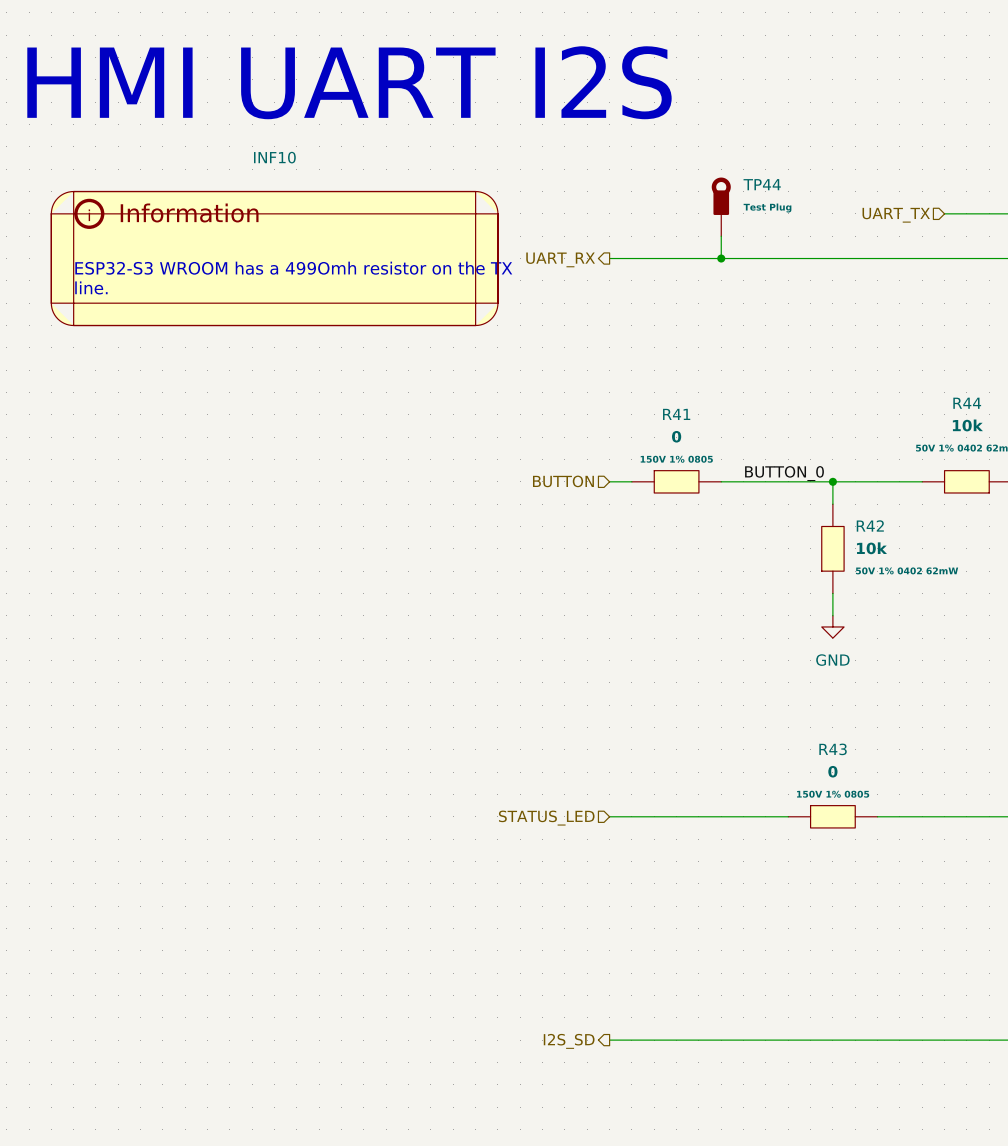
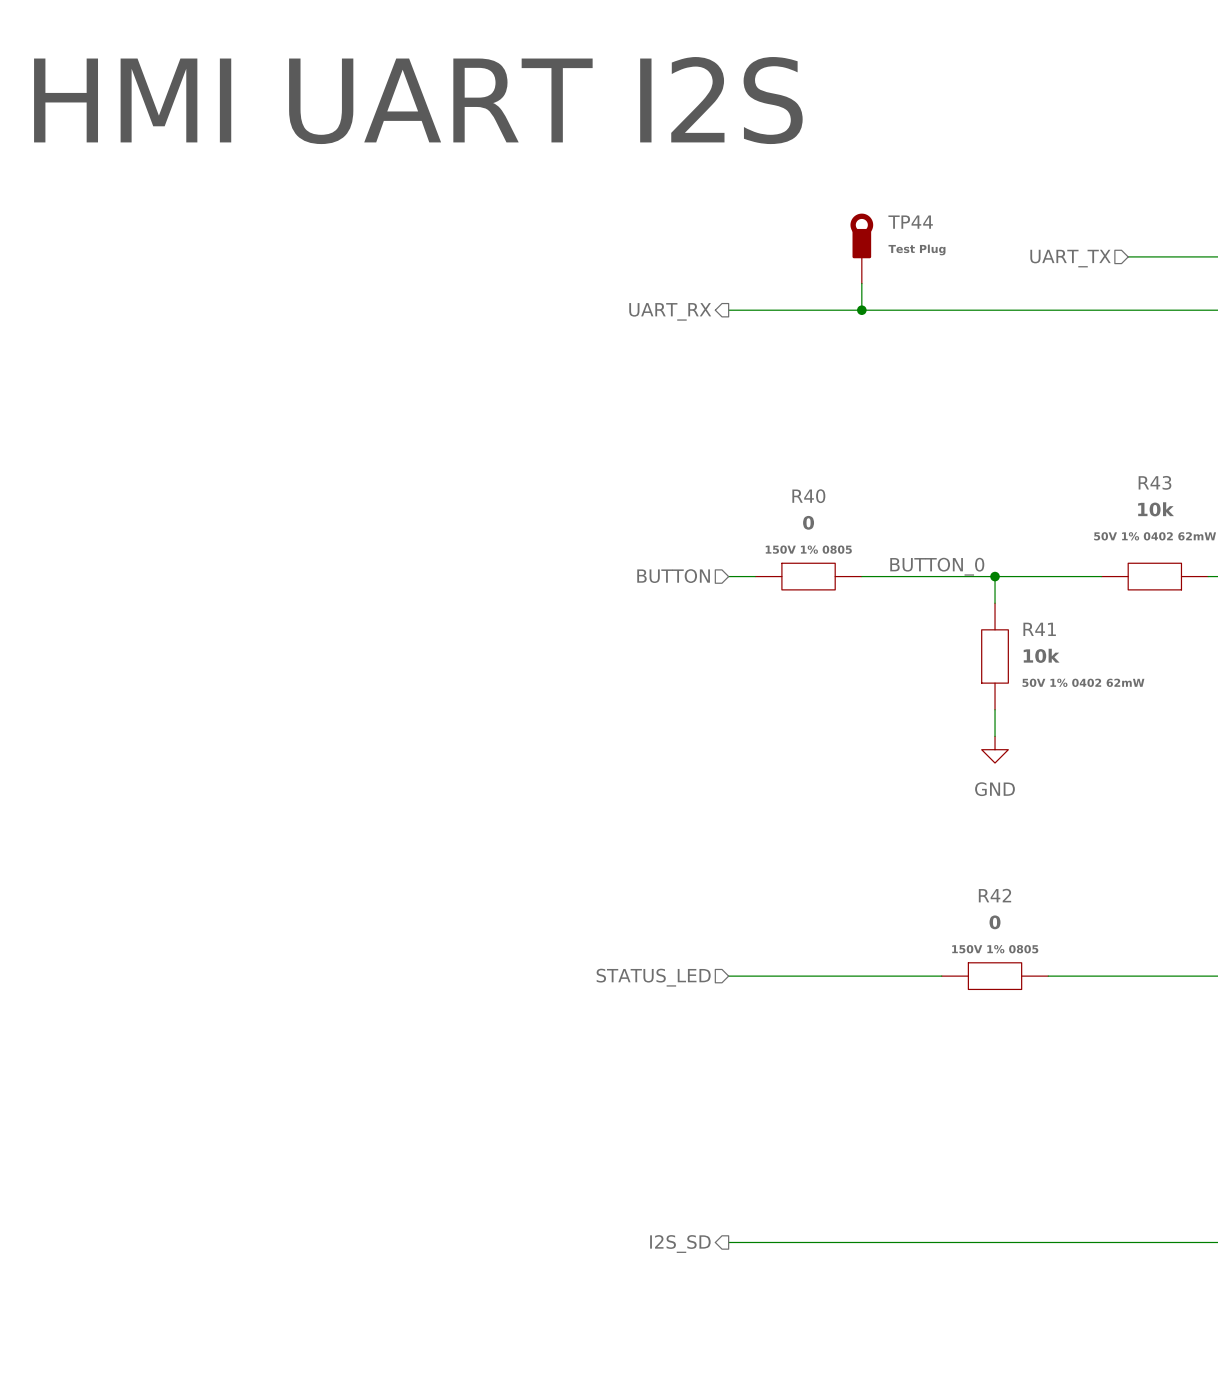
INF10: (274, 258) -> none
text: ESP32-S3 WROOM has a 499Omh resistor on the TX (293, 268) -> none
text: line. (91, 287) -> none
R44 name: R44 (967, 403) -> R43 (1154, 482)
R41 name: R41 (676, 414) -> R40 (808, 496)
R42 name: R42 (870, 525) -> R41 (1039, 629)
R43 name: R43 (833, 749) -> R42 (994, 895)

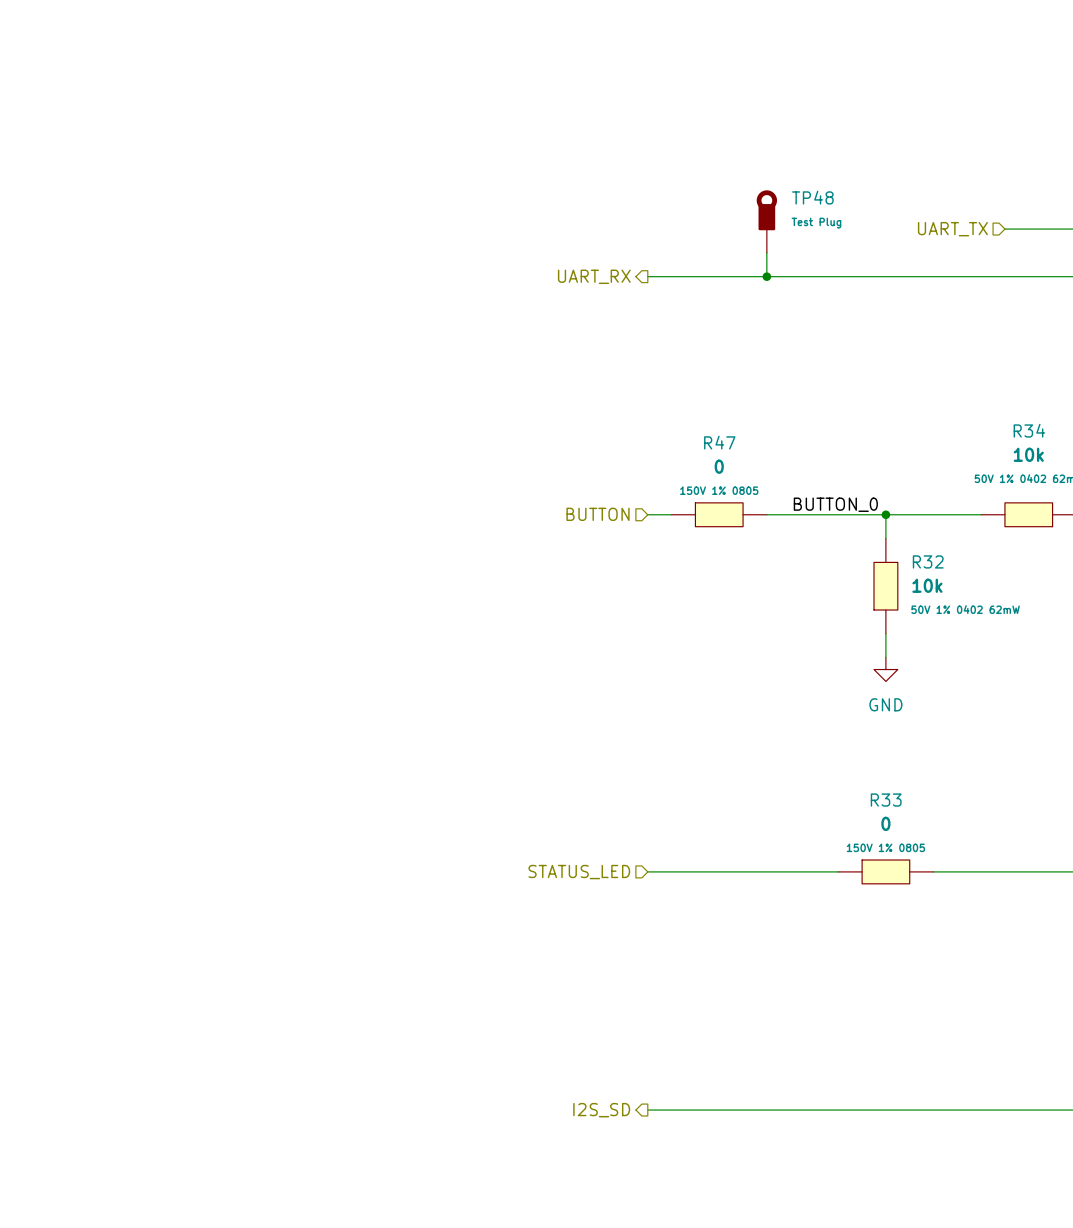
text: HMI UART I2S (418, 100) -> none
TP44 name: TP44 (910, 222) -> TP48 (812, 197)
R43 name: R43 (1154, 482) -> R34 (1029, 430)
R40 name: R40 (808, 496) -> R47 (719, 442)
R41 name: R41 (1039, 629) -> R32 (928, 561)
R42 name: R42 (994, 895) -> R33 (886, 800)

